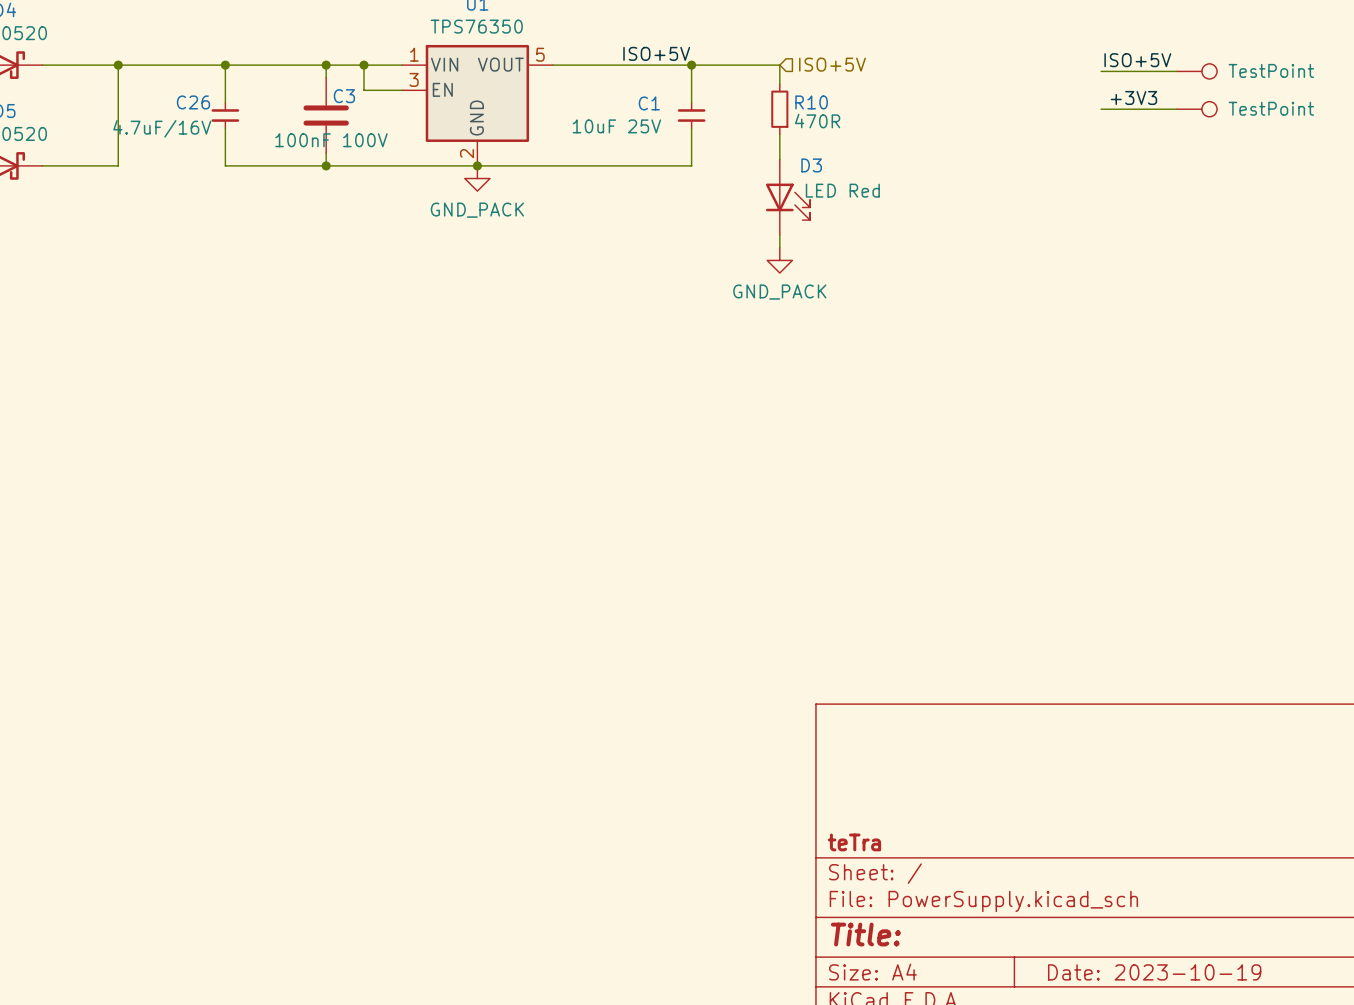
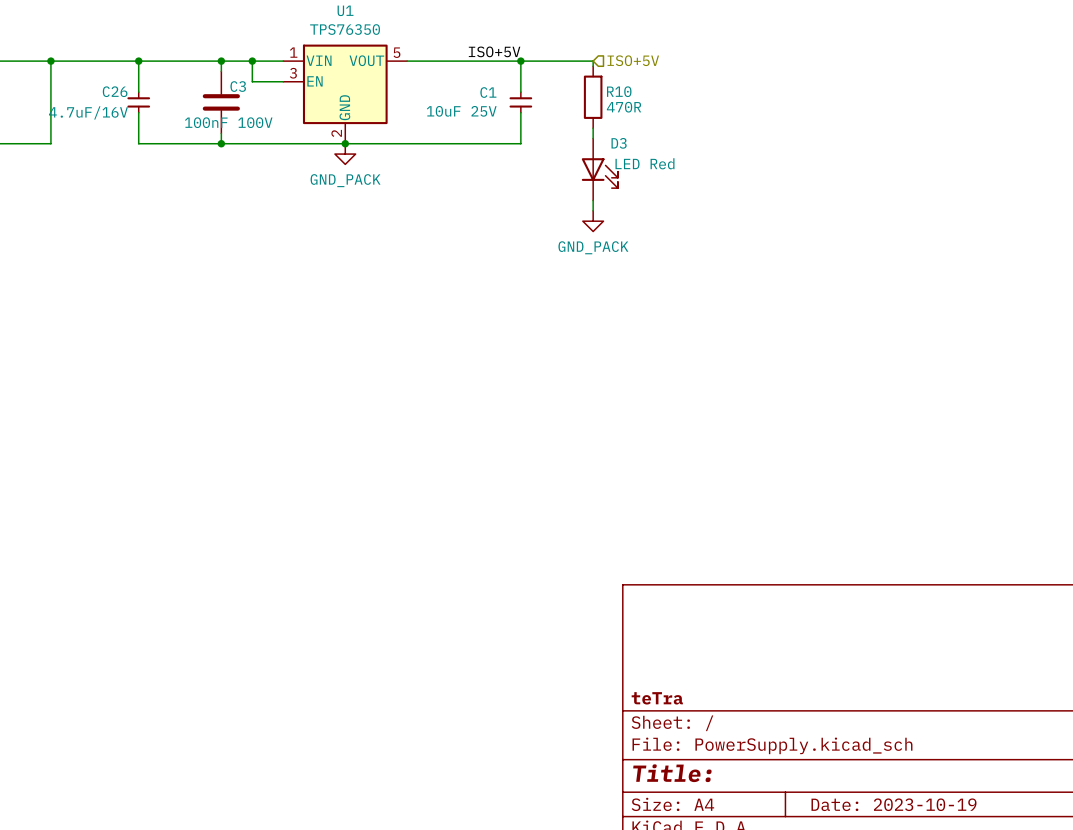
label: ISO+5V (1137, 60) -> none
wire: (1101, 71) (1176, 71) -> none
part: TestPoint (1196, 71) -> none
R10 symbol: [771, 84, 789, 135] -> [583, 66, 603, 129]
label: +3V3 (1133, 97) -> none
wire: (1101, 109) (1176, 109) -> none
part: TestPoint (1196, 109) -> none

